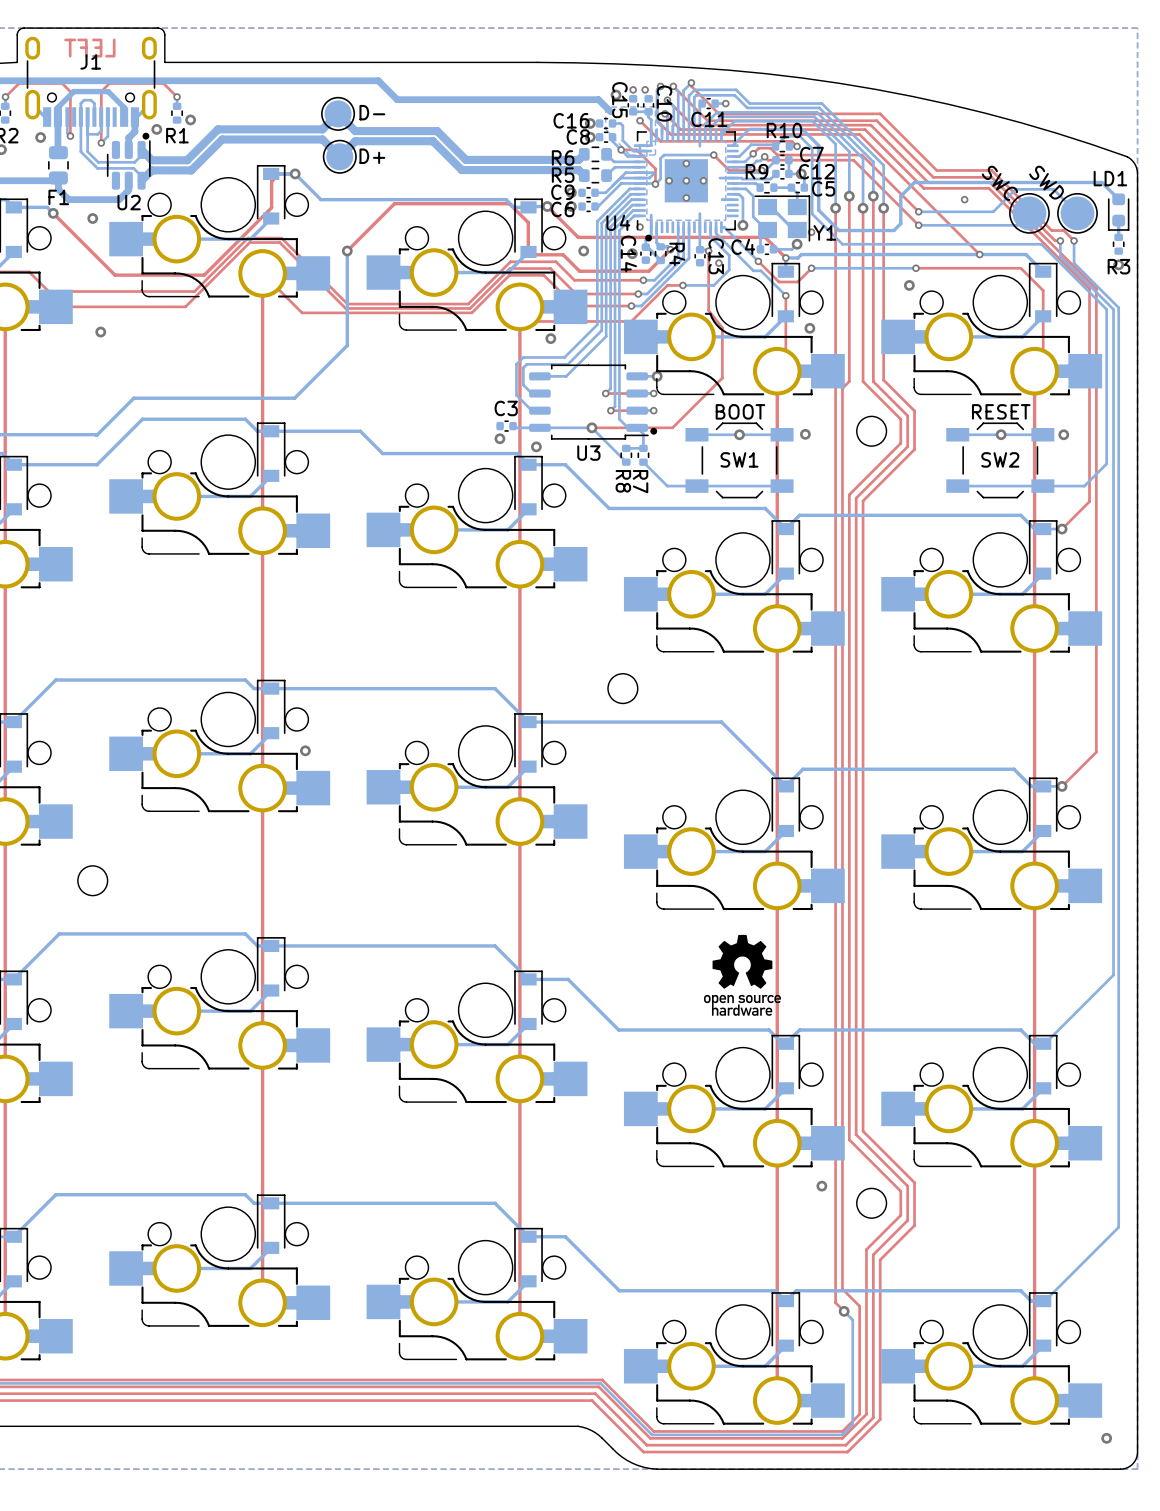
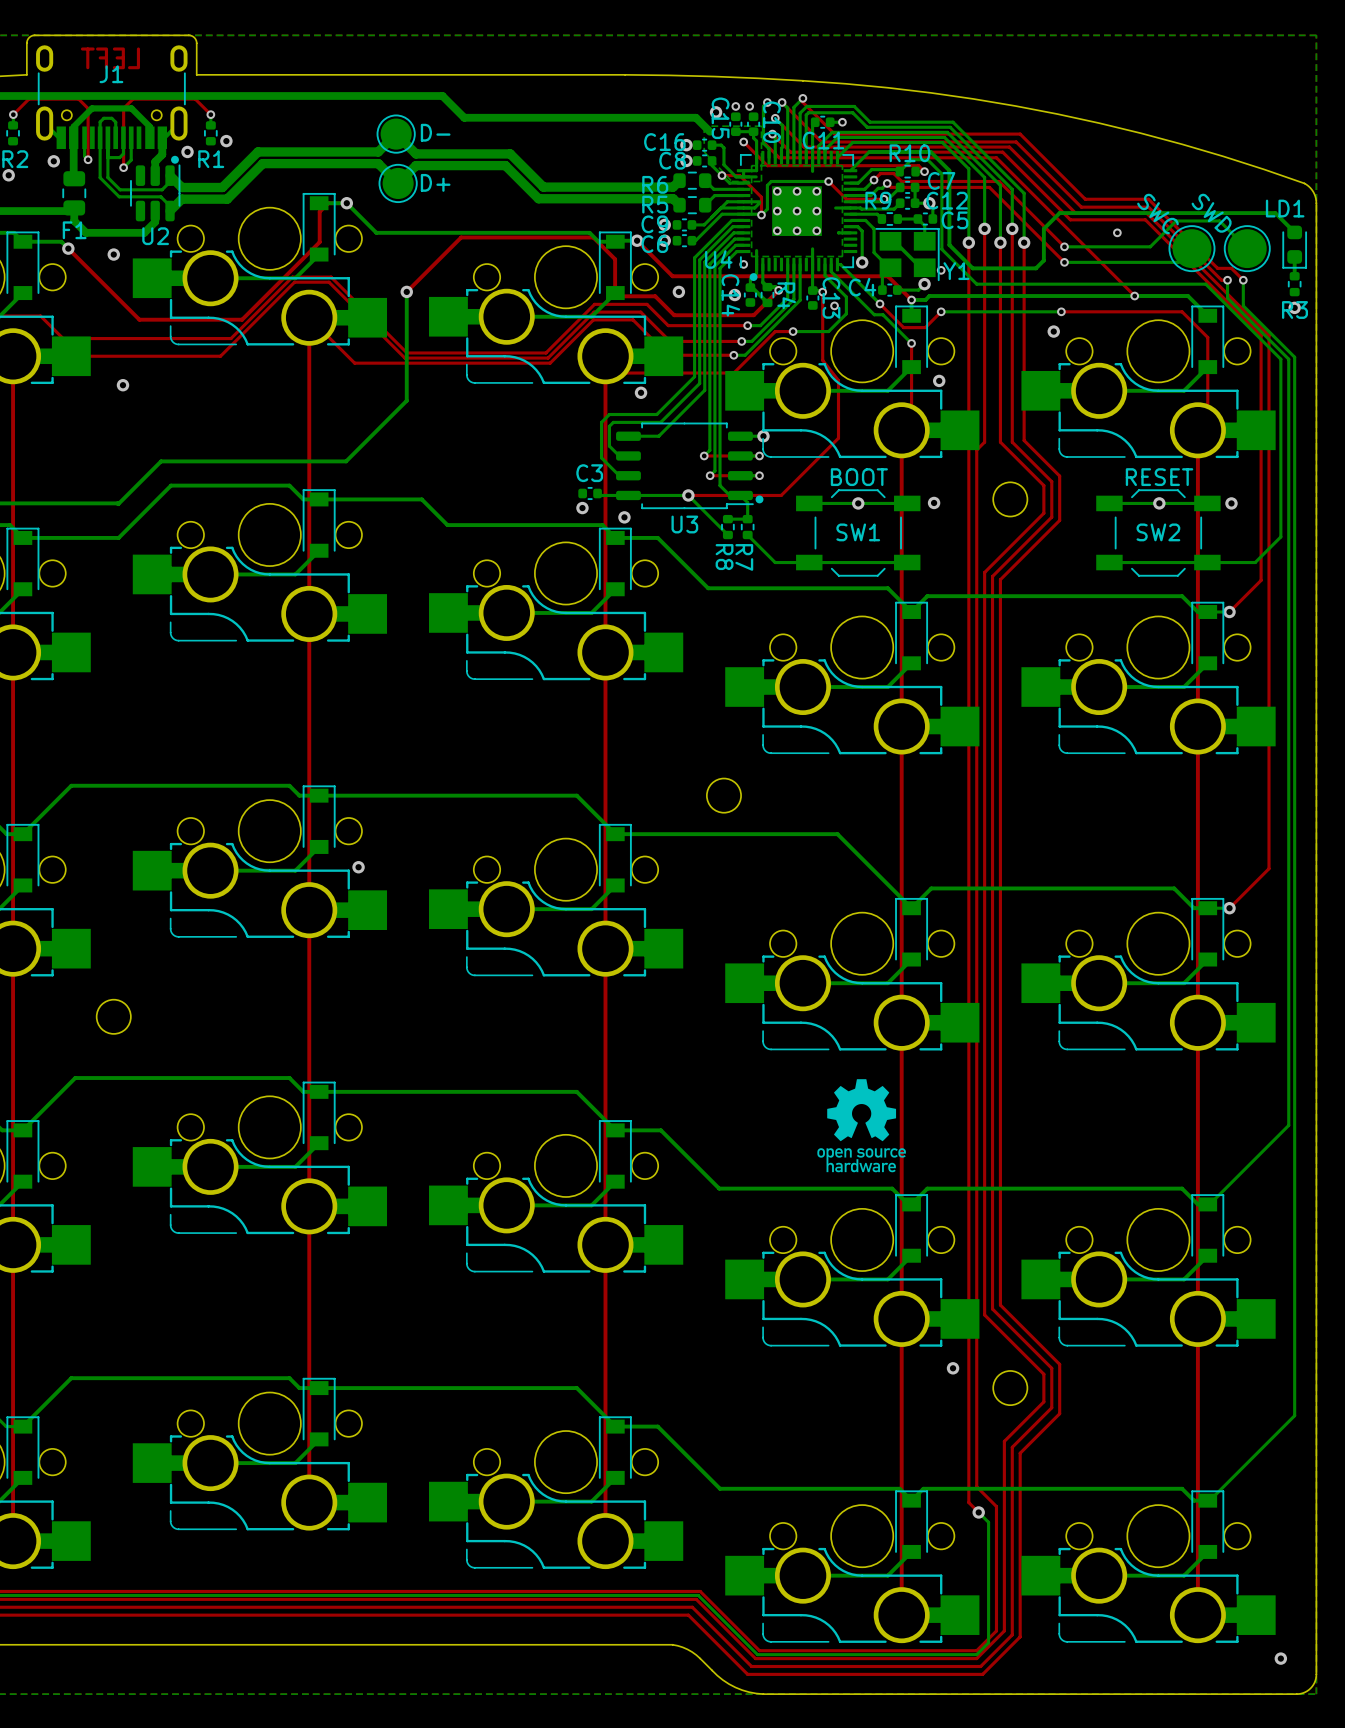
via: none -> (777, 191)
via: none -> (816, 191)
via: none -> (777, 230)
via: none -> (816, 230)

